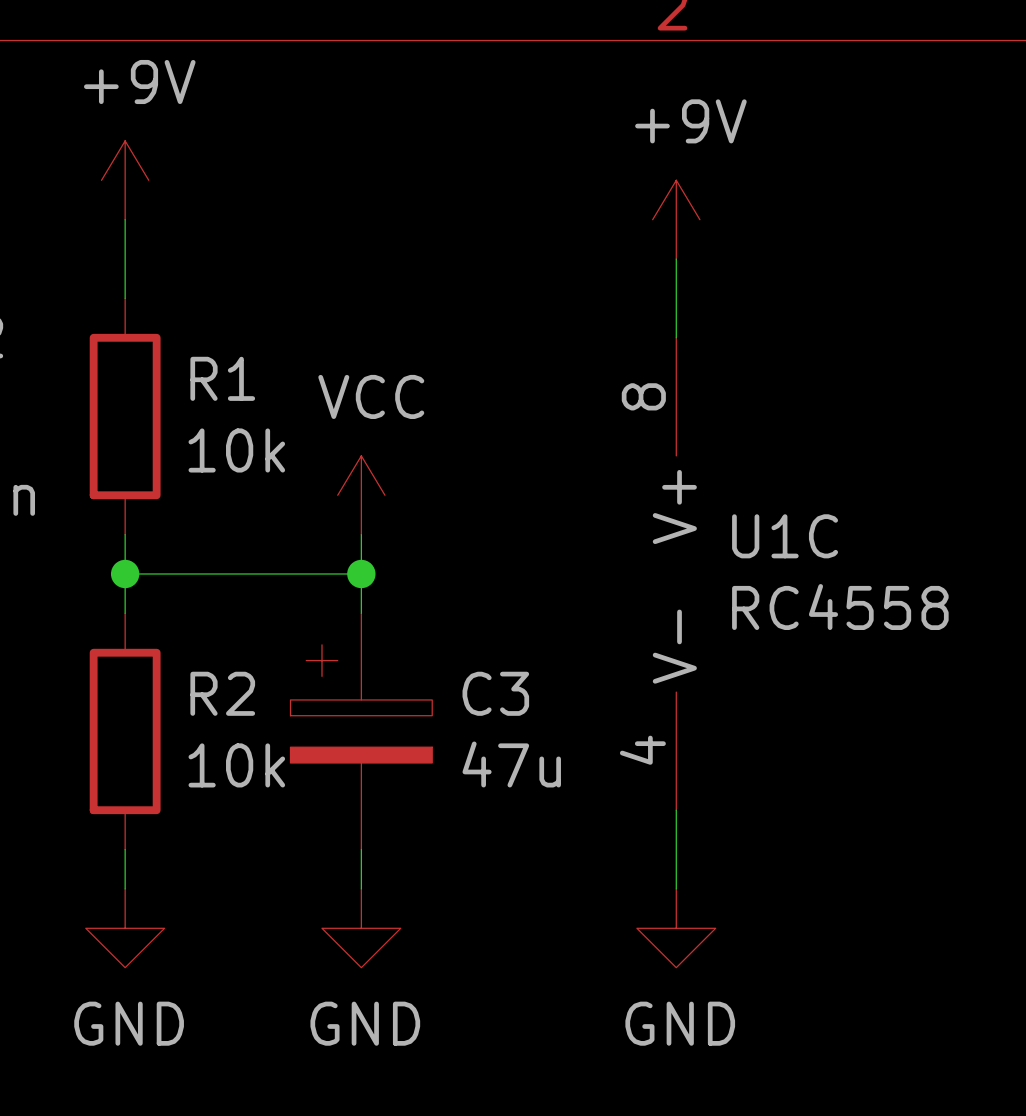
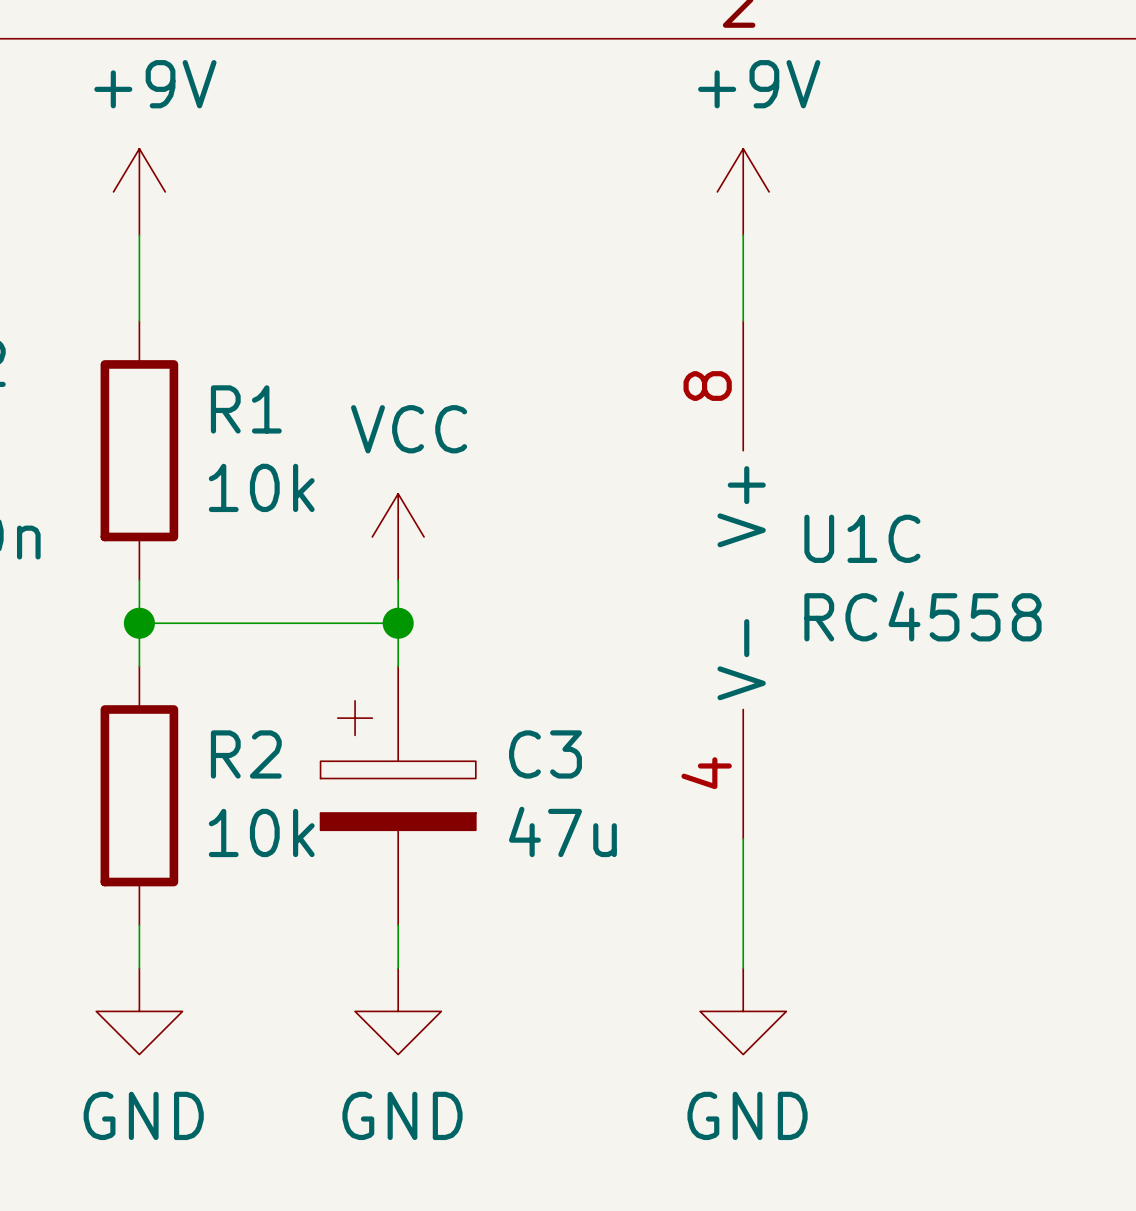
power symbol position: +9V (676, 219) -> +9V (743, 191)
U1C position: (676, 574) -> (743, 580)

